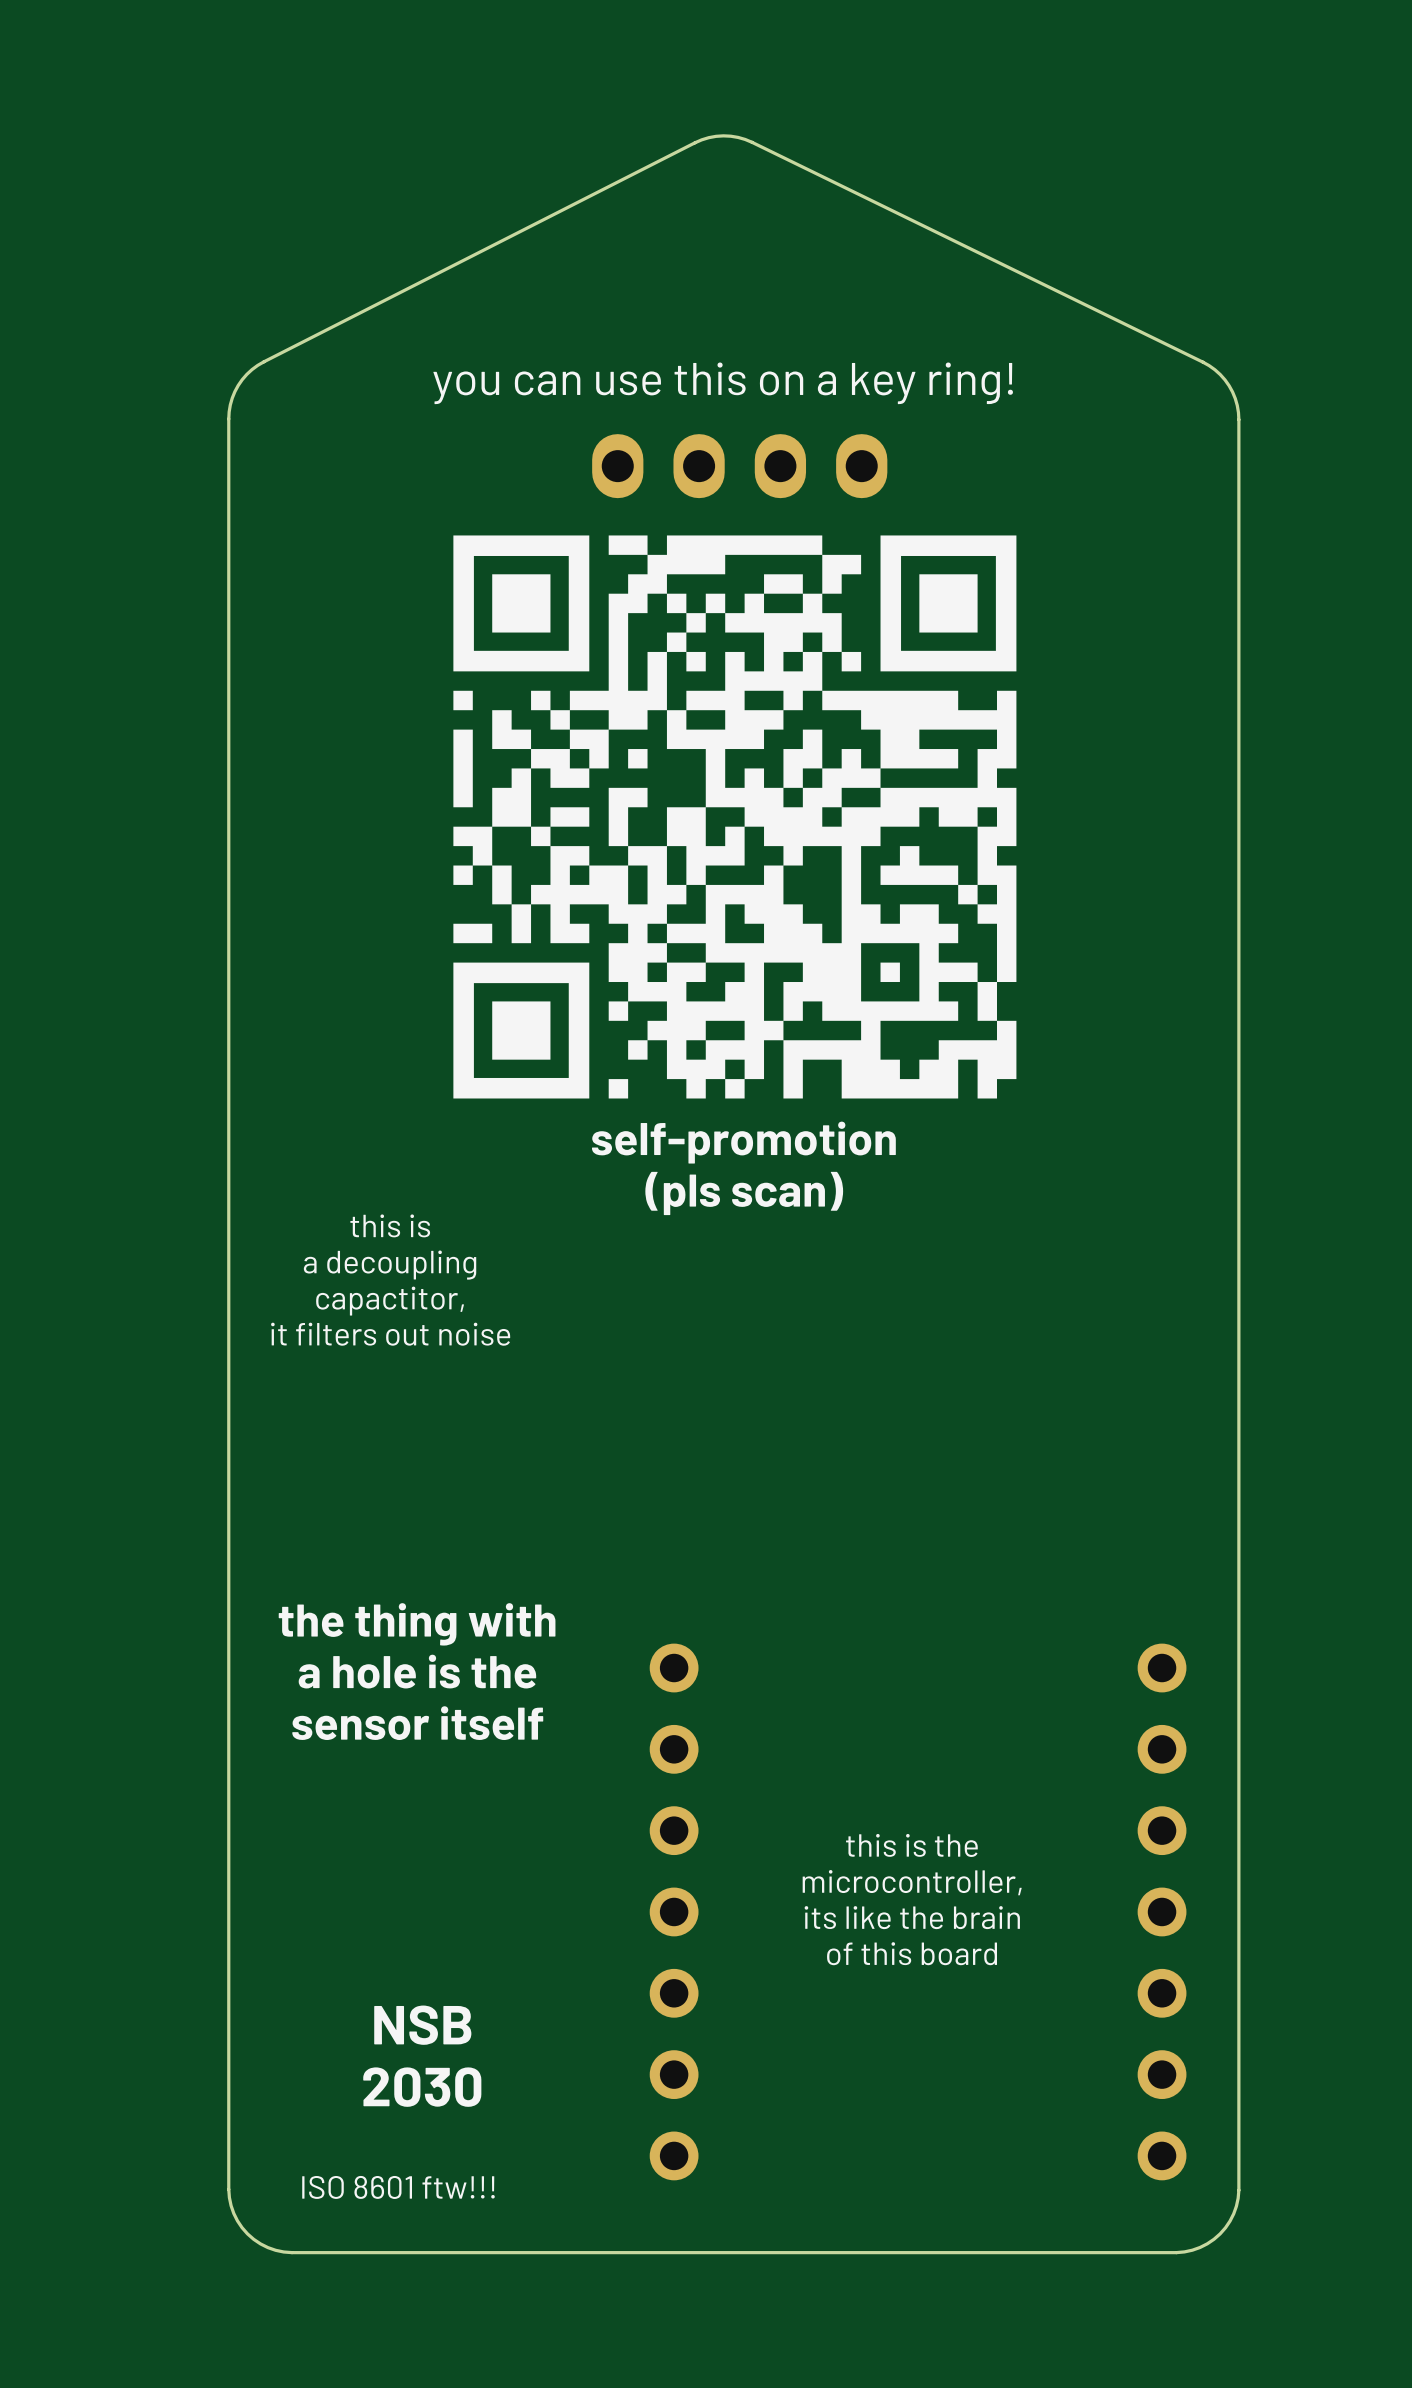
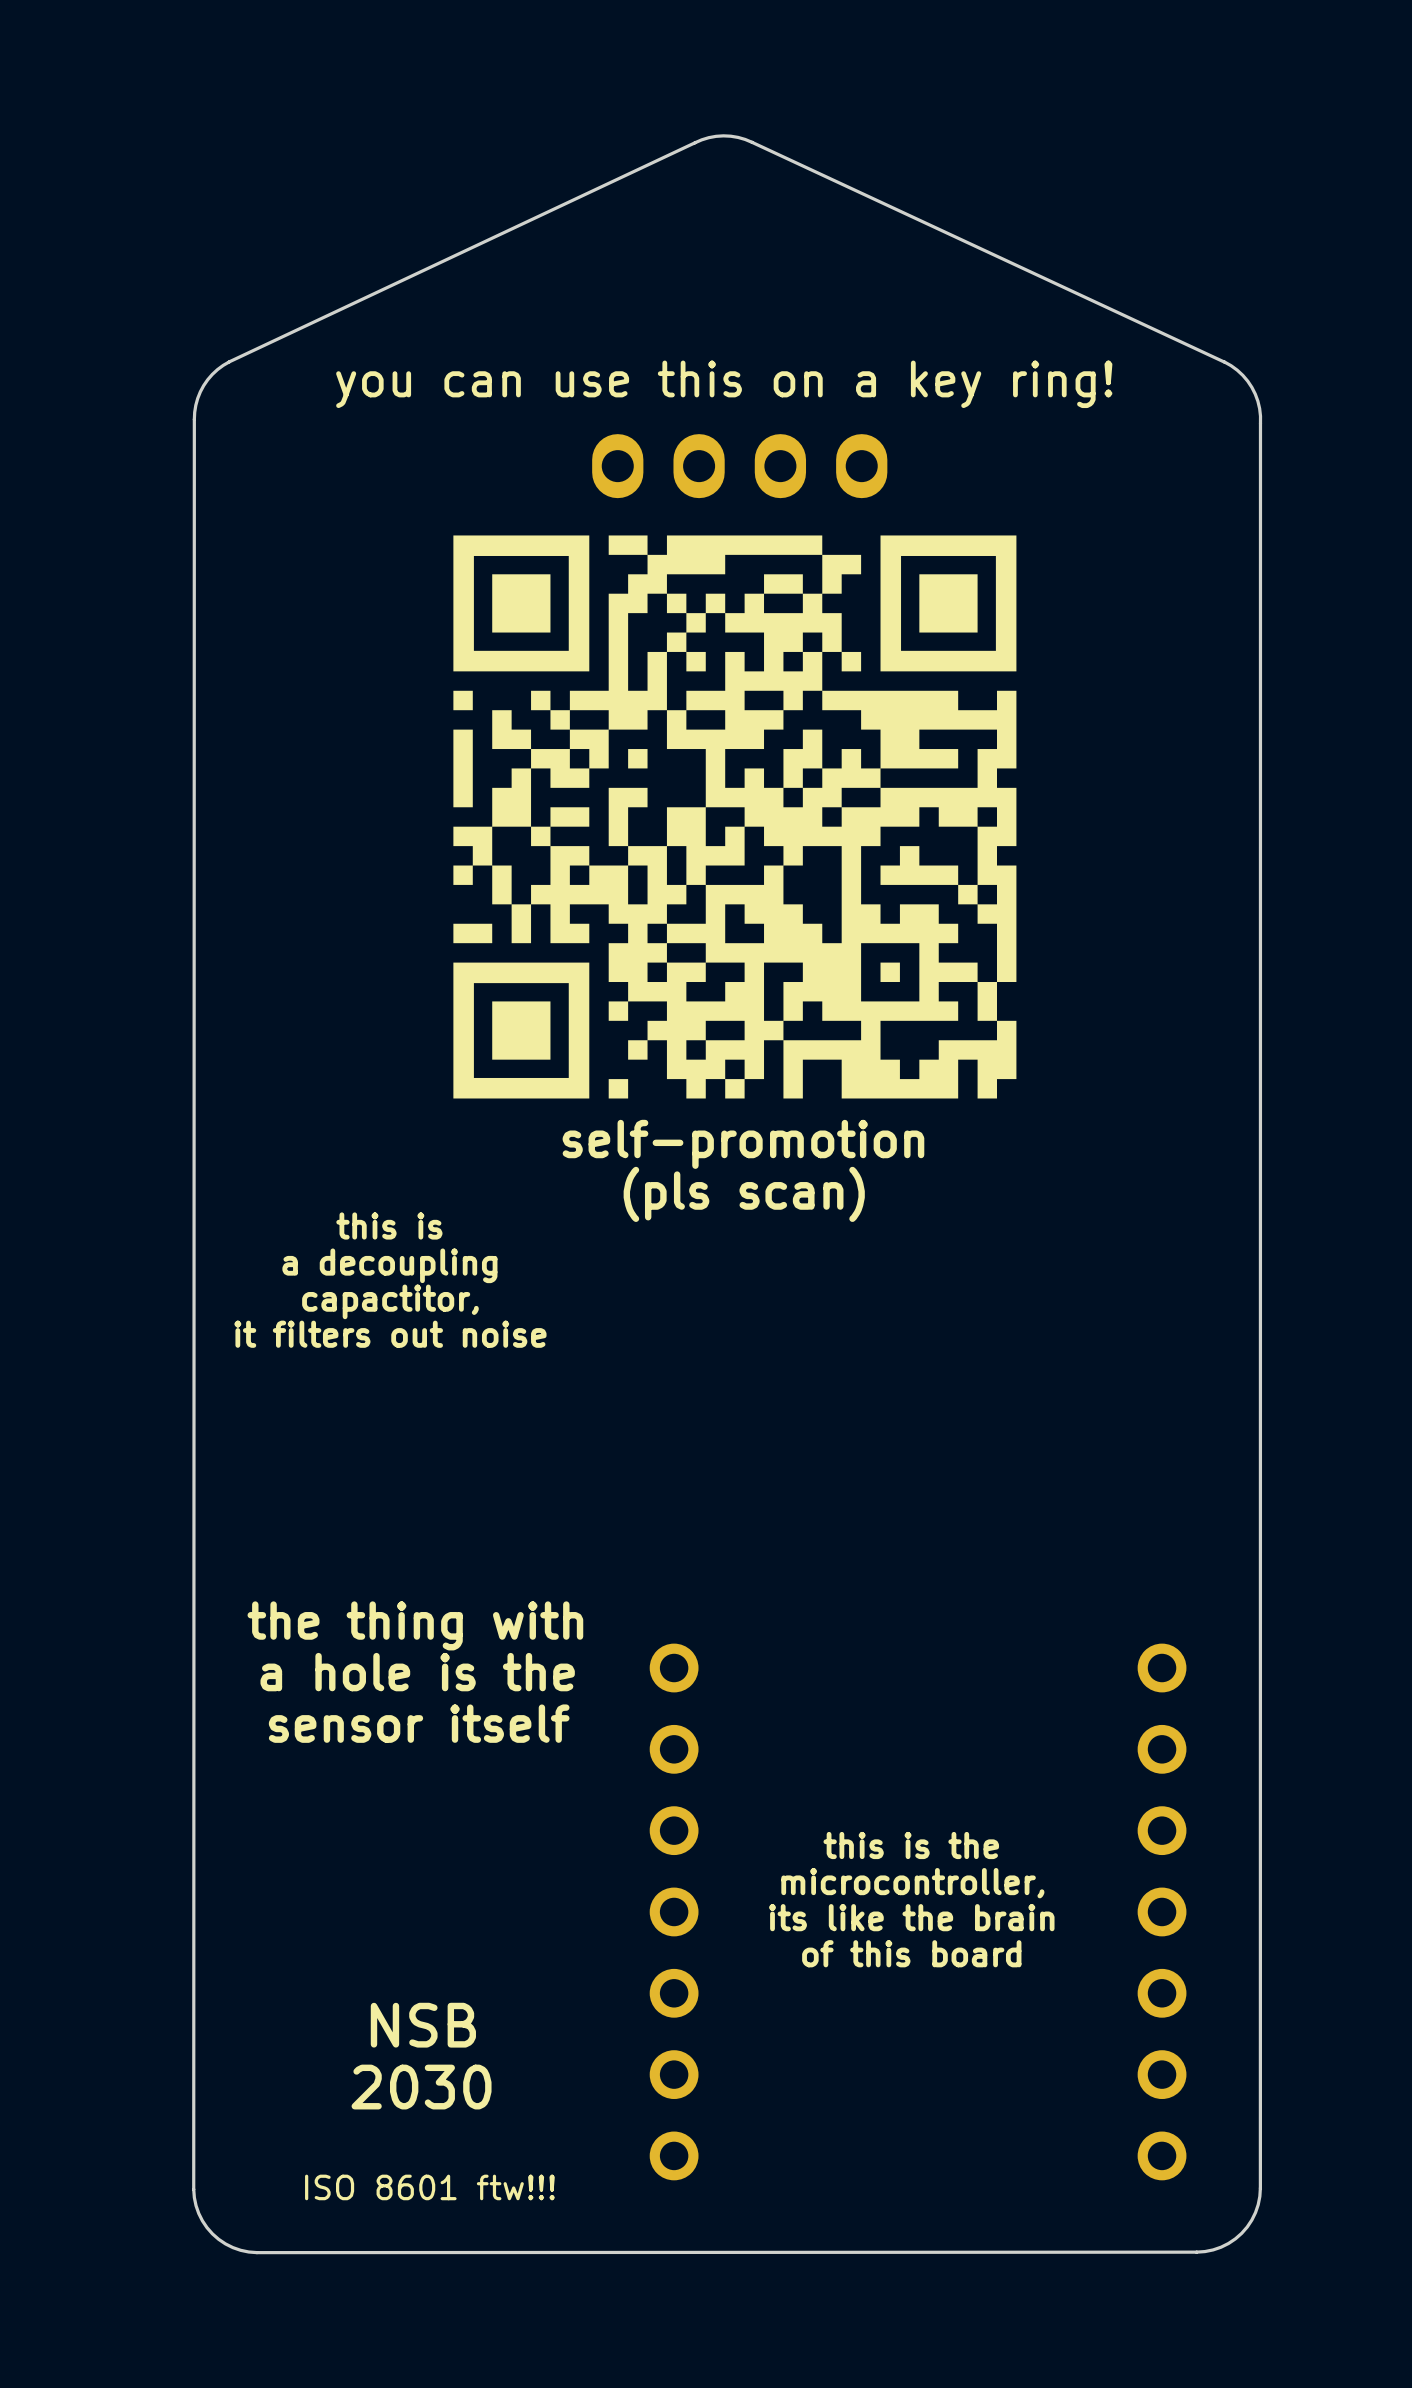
board edge: (752, 142) (1202, 362) (1214, 369) (1225, 379) (1232, 392) (1237, 405) (1238, 419) (1238, 2190) (1236, 2206) (1225, 2227) (1207, 2243) (1184, 2251) (292, 2252) (275, 2250) (253, 2239) (237, 2220) (231, 2205) (228, 2189) (228, 418) (230, 404) (234, 391) (242, 379) (252, 369) (263, 361) (695, 142) -> (752, 142) (1224, 362) (1237, 370) (1247, 381) (1255, 394) (1259, 408) (1260, 2188) (1255, 2212) (1247, 2226) (1228, 2243) (1213, 2249) (1196, 2252) (256, 2252) (232, 2247) (218, 2239) (202, 2220) (196, 2205) (193, 2189) (195, 405) (200, 391) (207, 379) (217, 369) (229, 361) (695, 142)

